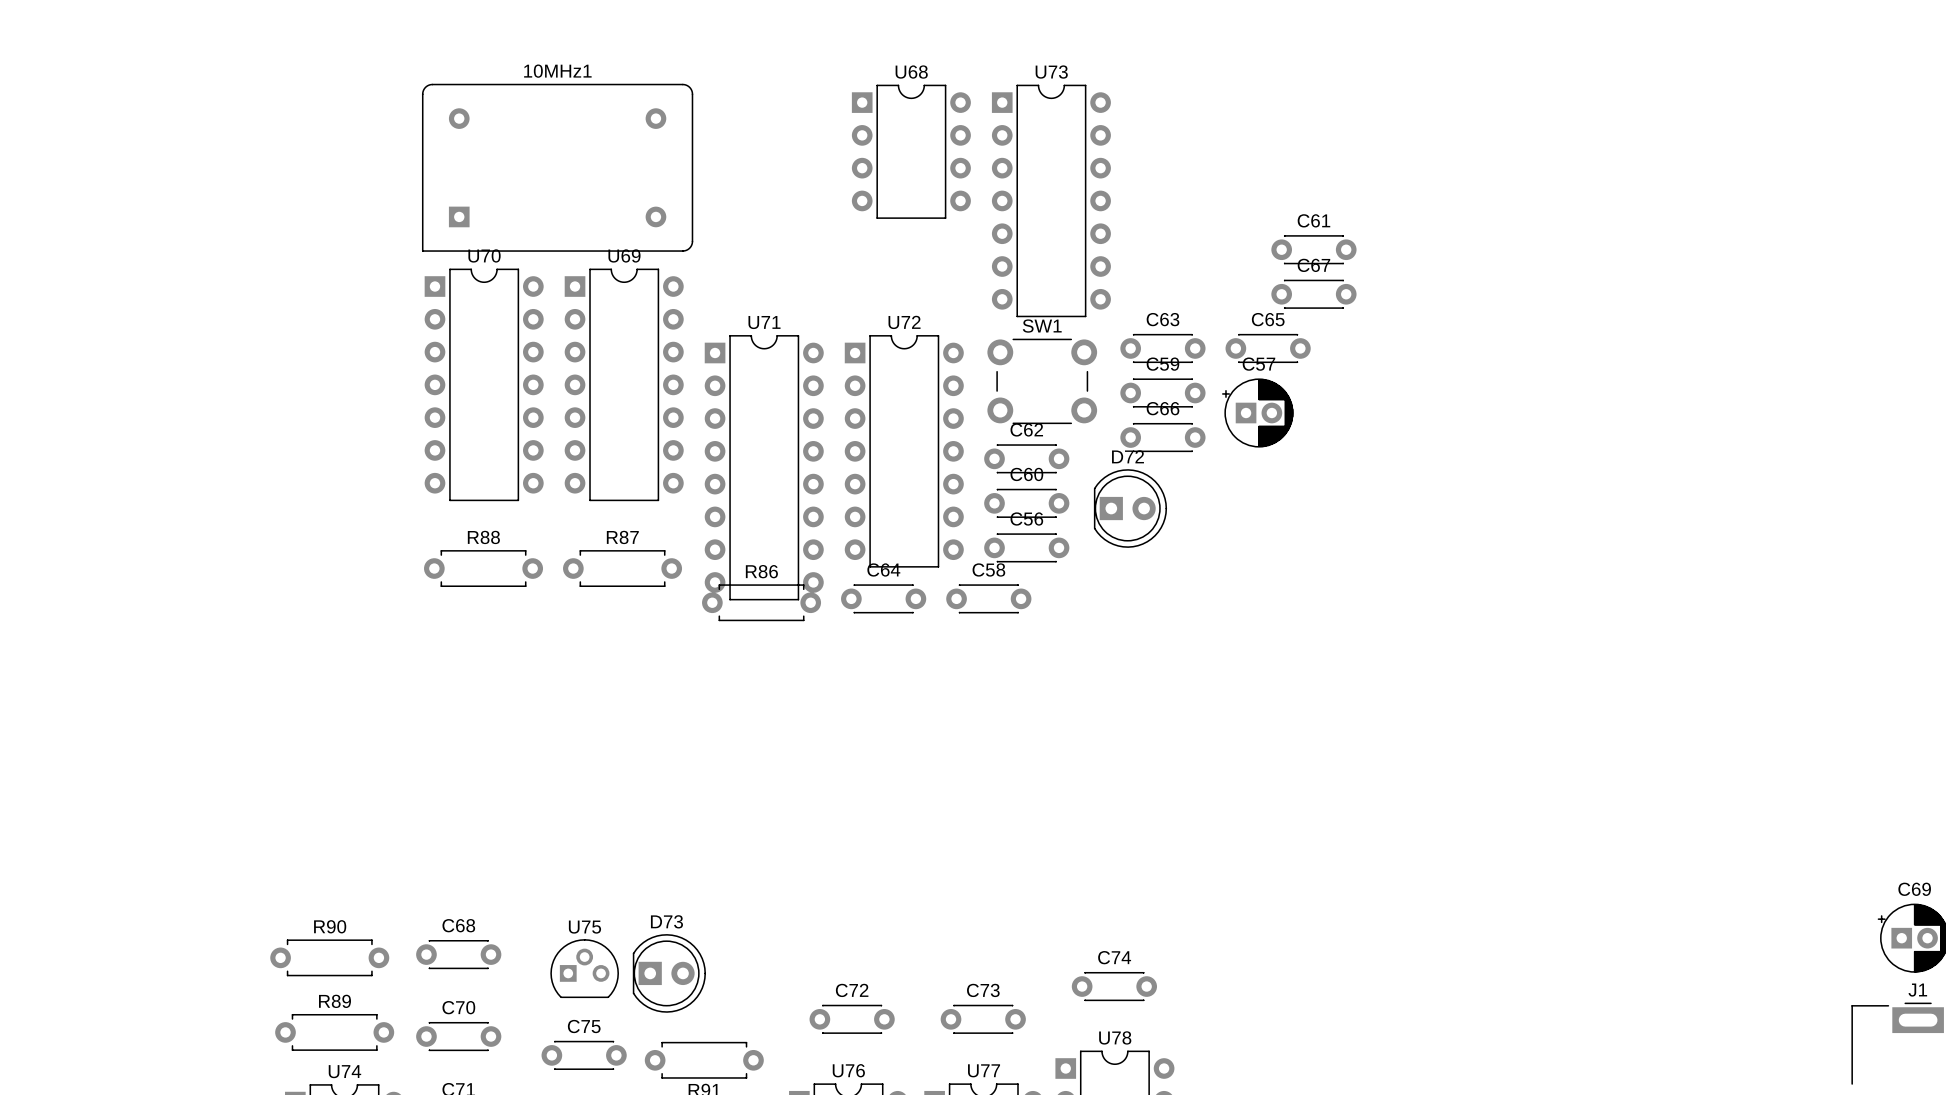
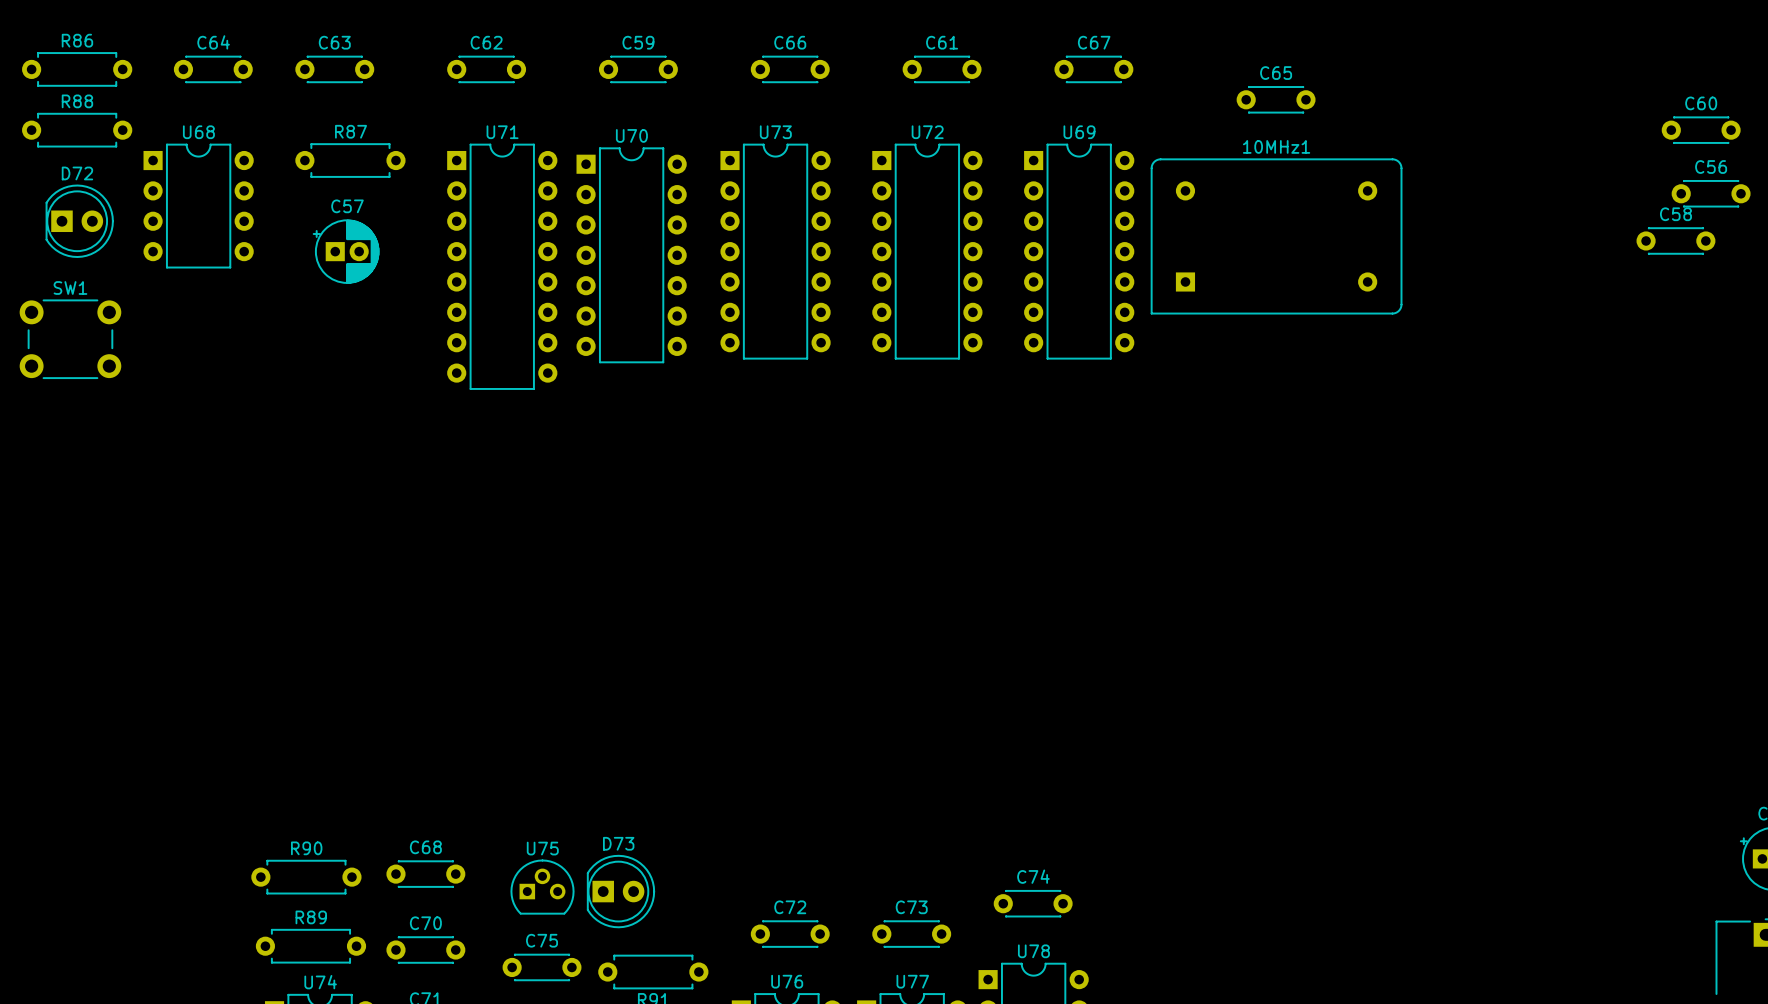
U68 position: (911, 151) -> (198, 206)
10MHz1 position: (557, 167) -> (1276, 236)
U73 position: (1051, 200) -> (775, 251)
C61 position: (1313, 249) -> (942, 69)
C67 position: (1313, 294) -> (1093, 69)
C63 position: (1162, 348) -> (334, 69)
C65 position: (1268, 348) -> (1276, 99)
SW1 position: (1042, 381) -> (70, 339)
U70 position: (484, 384) -> (631, 255)
U69 position: (624, 384) -> (1079, 251)
C59 position: (1162, 393) -> (638, 69)
C57 position: (1257, 413) -> (346, 251)
C66 position: (1162, 437) -> (790, 69)
U72 position: (904, 451) -> (927, 251)
C62 position: (1026, 458) -> (486, 69)
U71 position: (764, 467) -> (502, 266)
C60 position: (1026, 503) -> (1701, 130)
D72 position: (1130, 508) -> (79, 221)
C56 position: (1026, 547) -> (1711, 193)
R88 position: (483, 568) -> (77, 130)
R87 position: (622, 568) -> (350, 160)
C64 position: (883, 598) -> (213, 69)
C58 position: (988, 598) -> (1675, 240)
R86 position: (761, 602) -> (77, 69)

